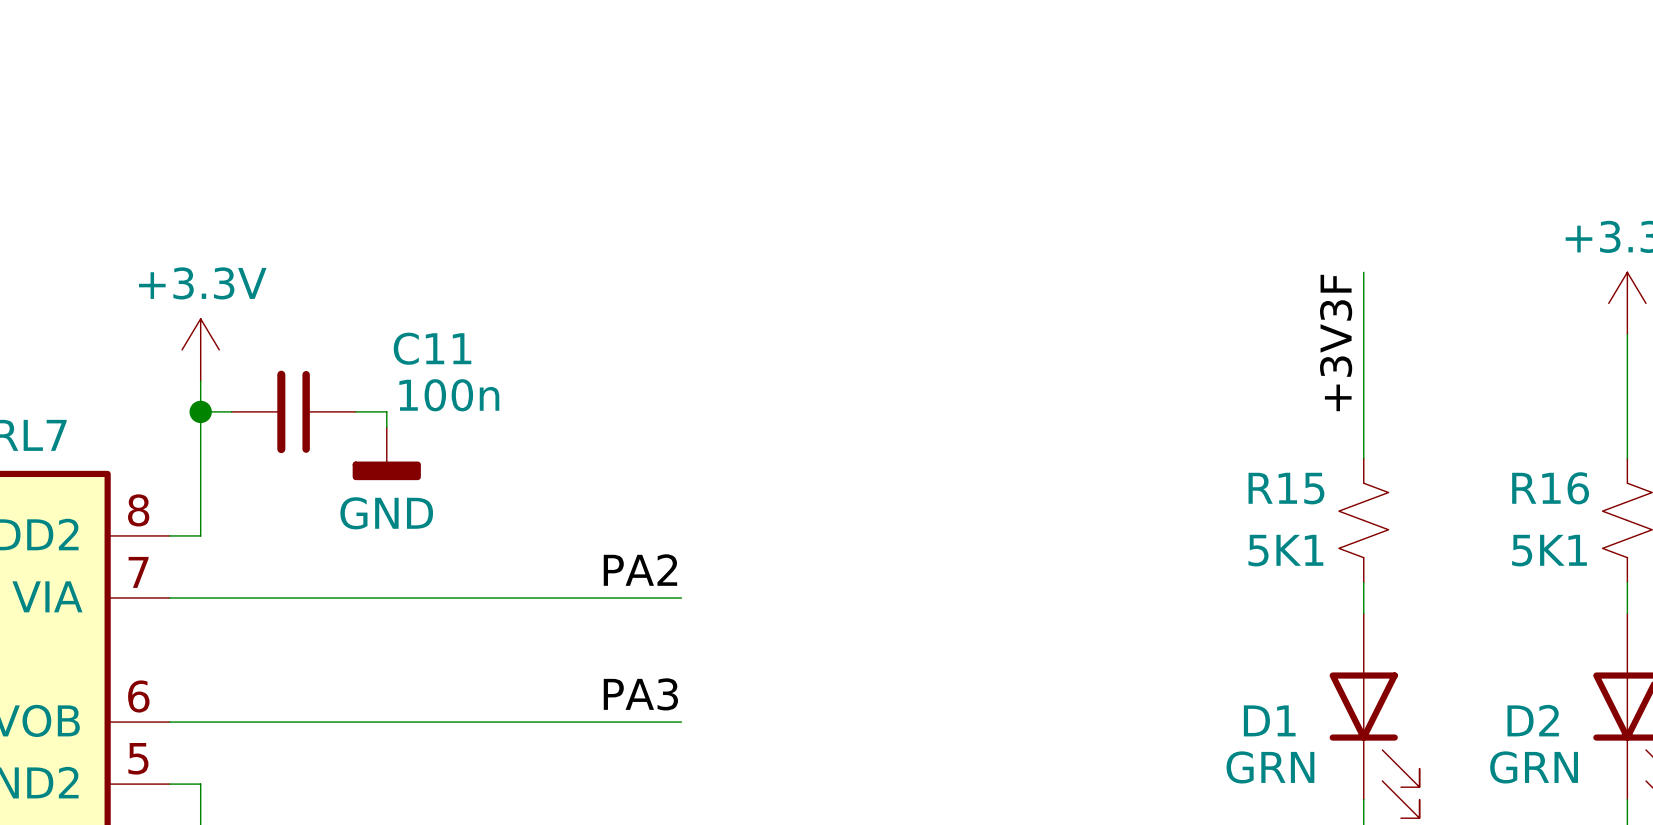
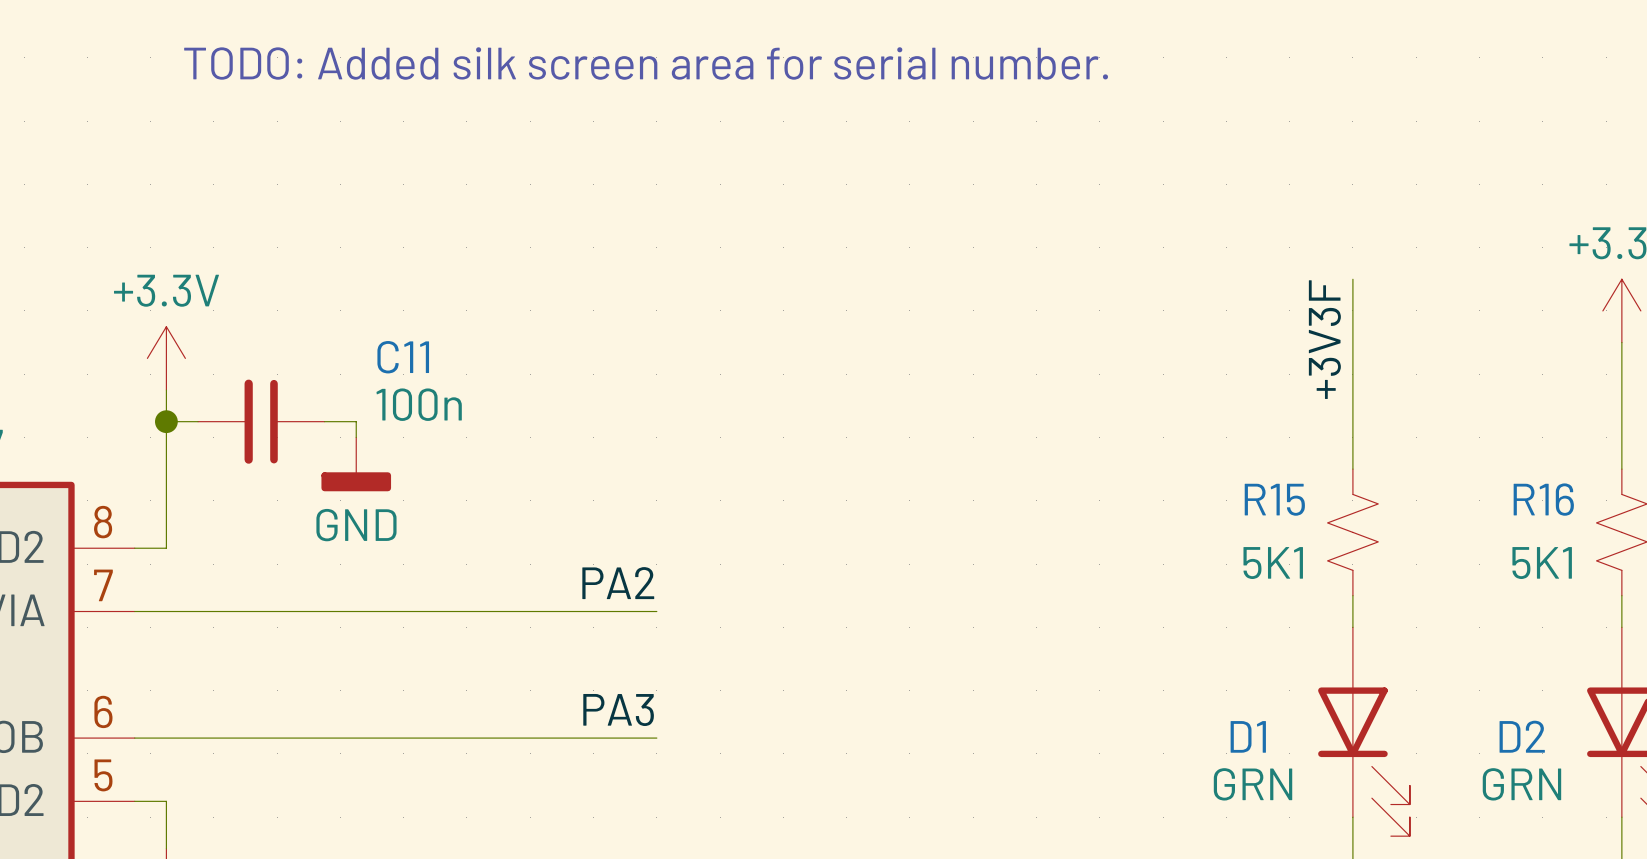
text: none -> TODO: Added silk screen area for serial number. (646, 63)

